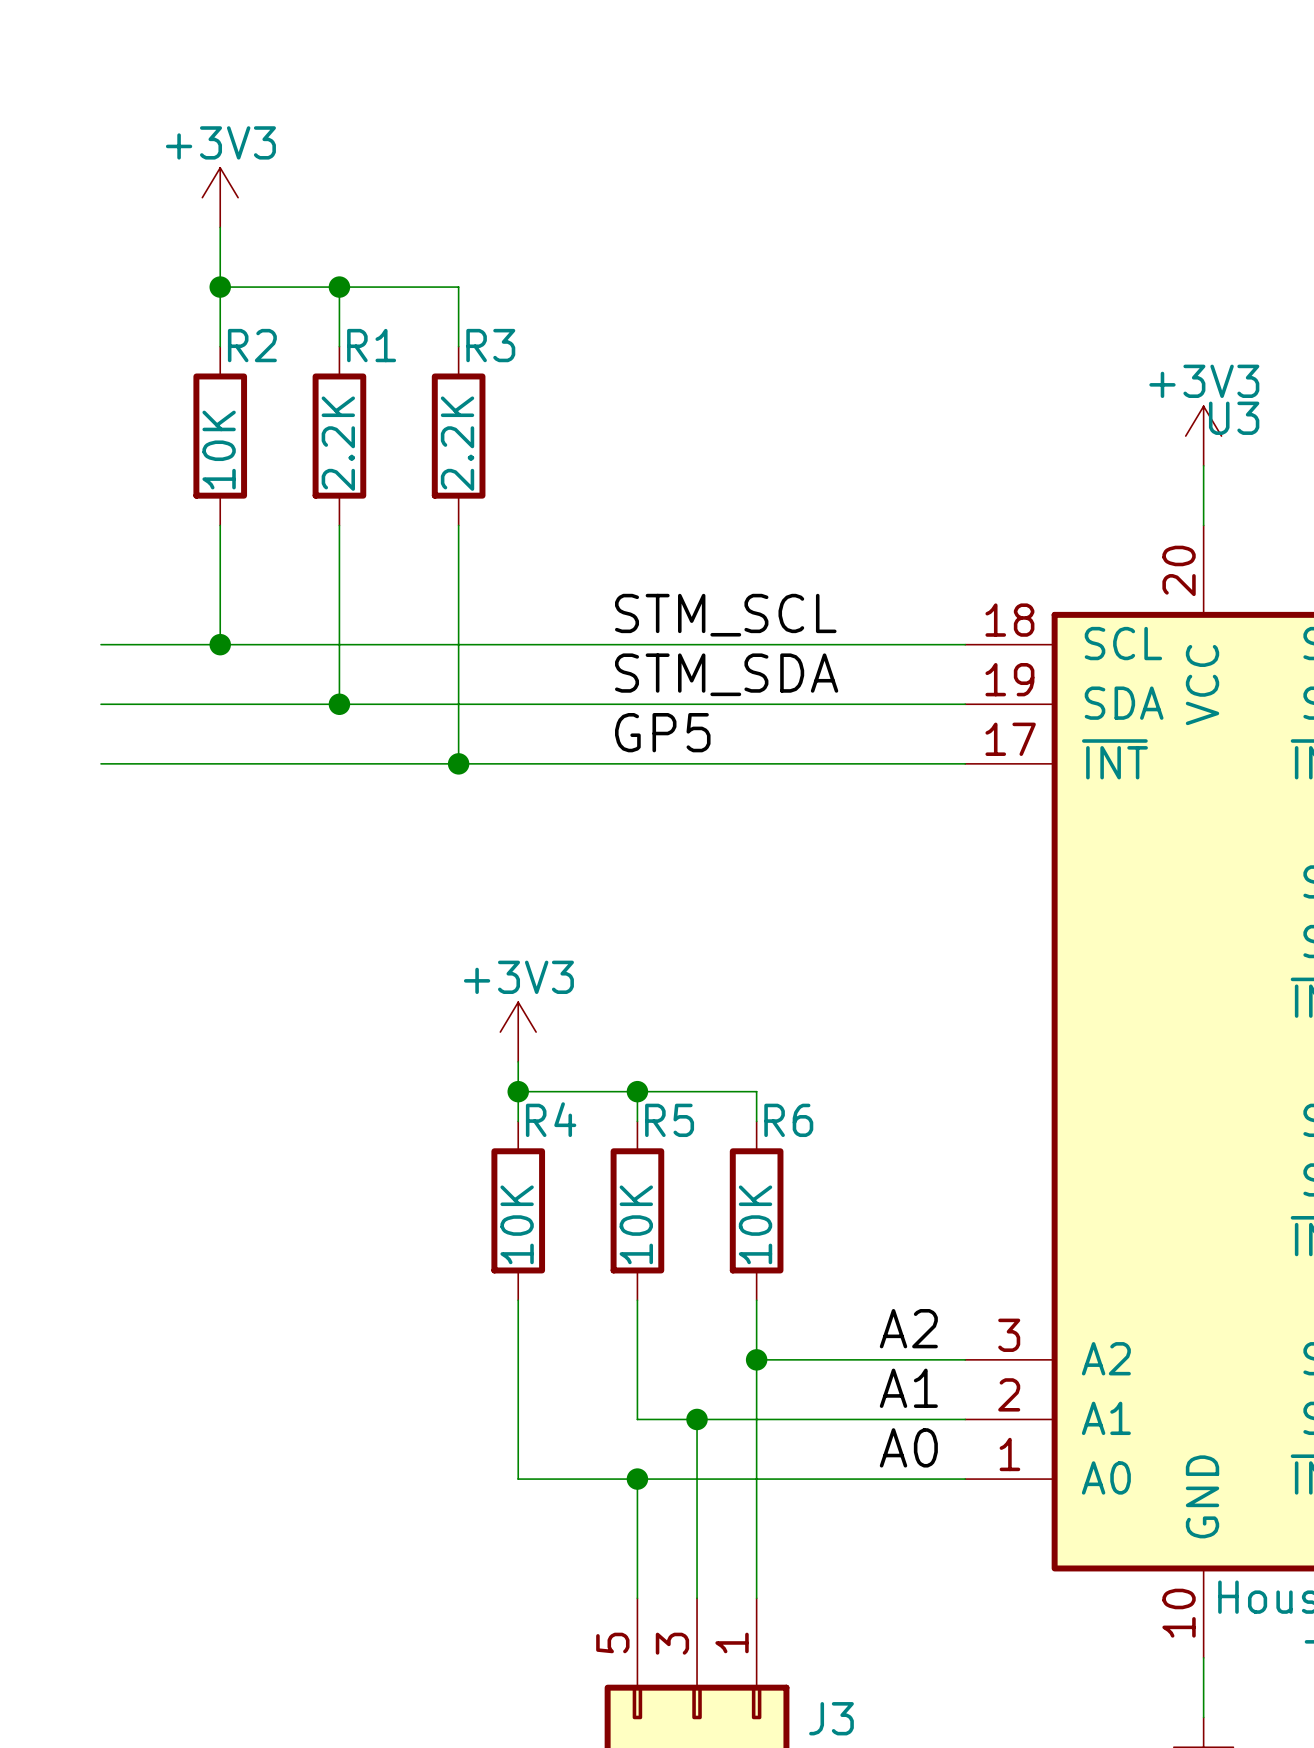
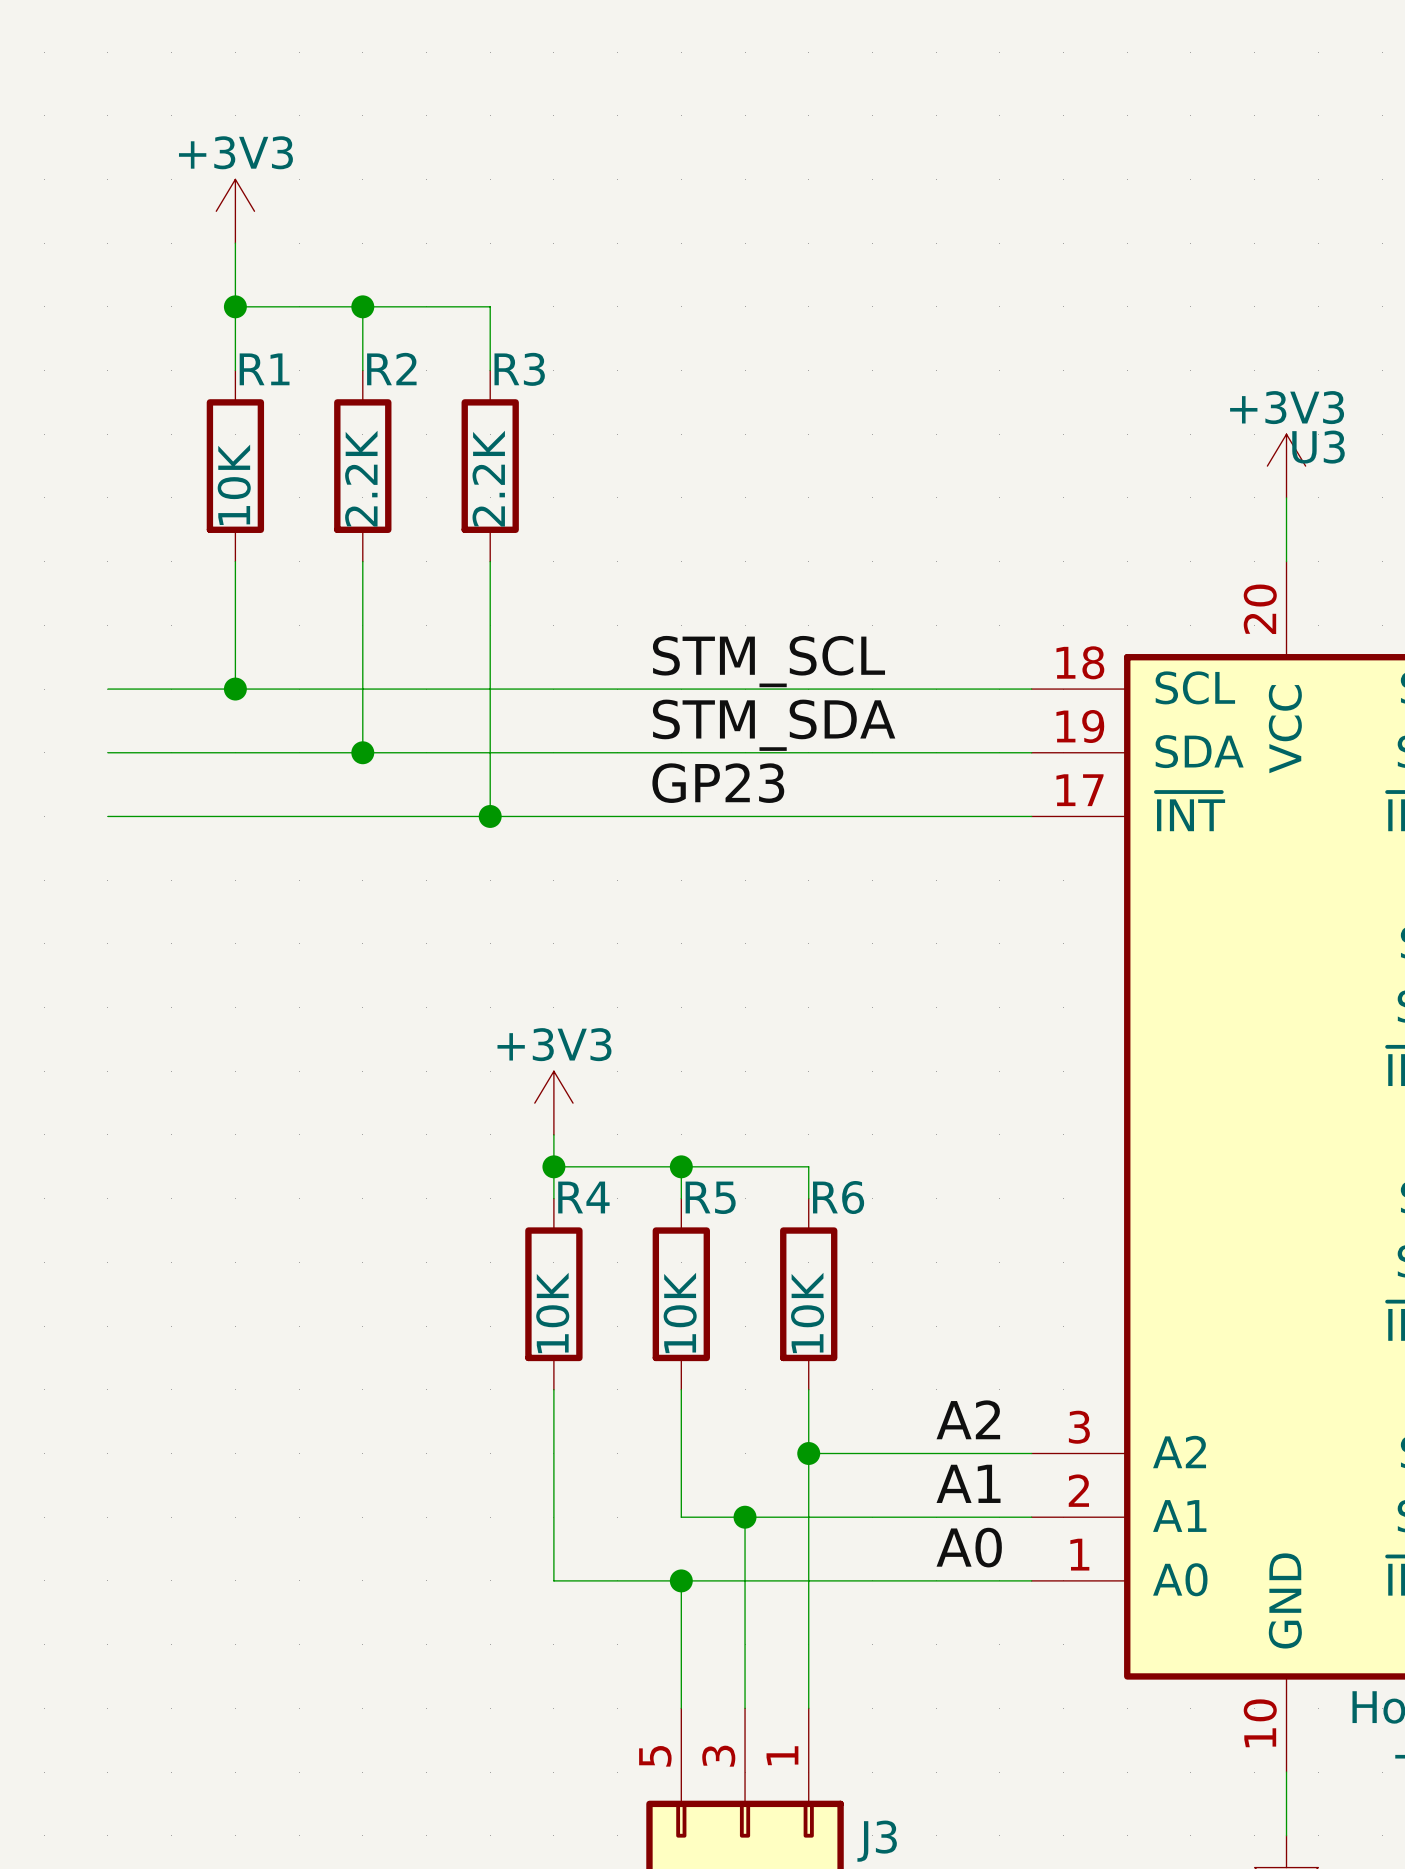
R2 name: R2 (252, 345) -> R1 (264, 369)
R1 name: R1 (371, 345) -> R2 (391, 369)
label: GP5 (662, 732) -> GP23 (718, 783)

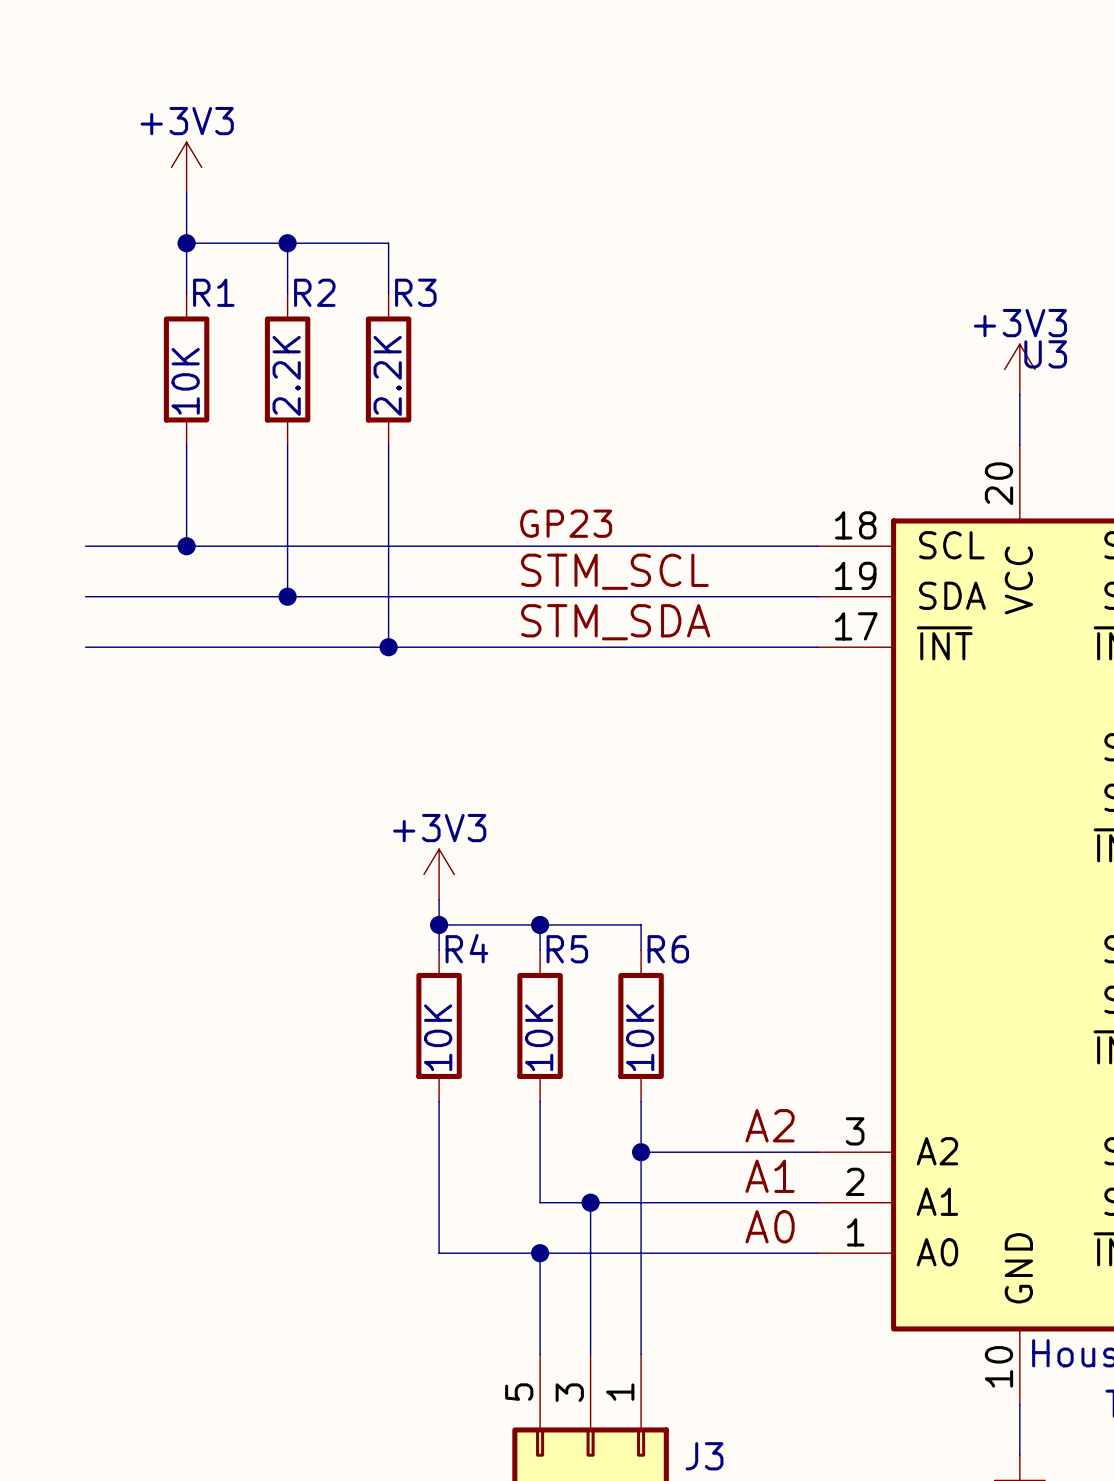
label: STM_SCL (768, 661) -> GP23 (566, 523)
label: STM_SDA (774, 725) -> STM_SCL (614, 571)
label: GP23 (718, 783) -> STM_SDA (615, 622)

